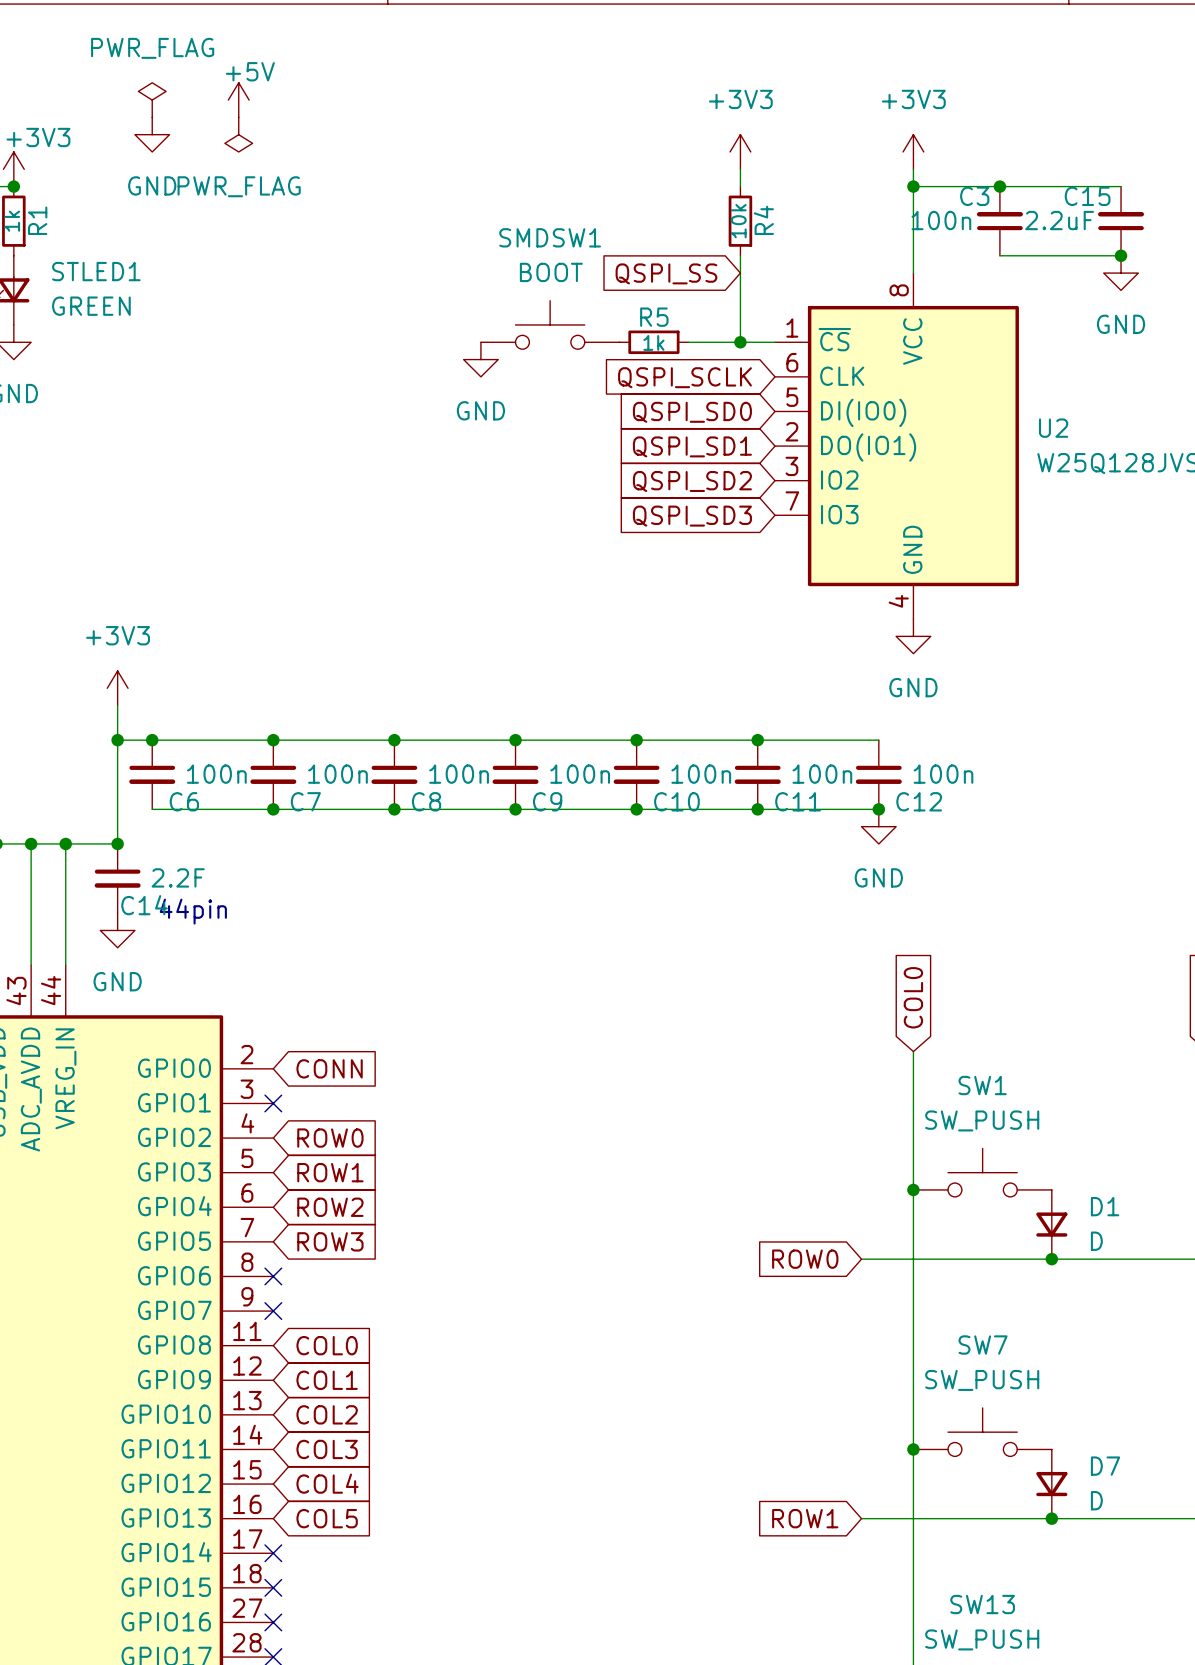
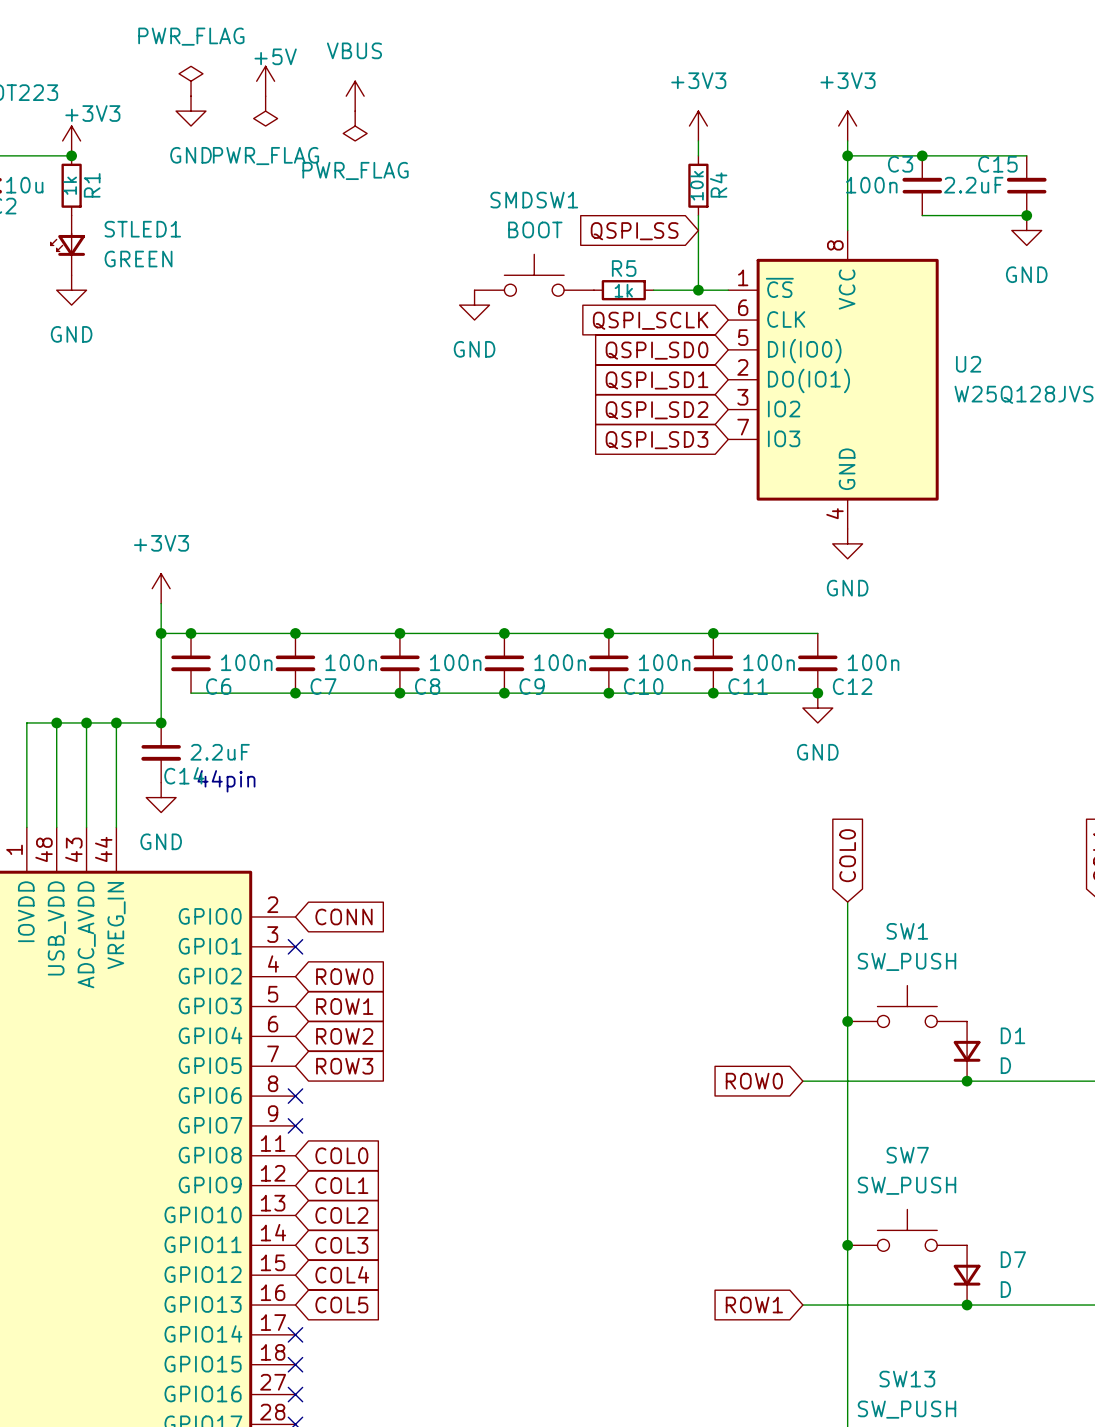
power symbol: none -> VBUS (355, 96)
power symbol: none -> PWR_FLAG (355, 126)
C14 value: 2.2F (178, 877) -> 2.2uF (220, 752)

